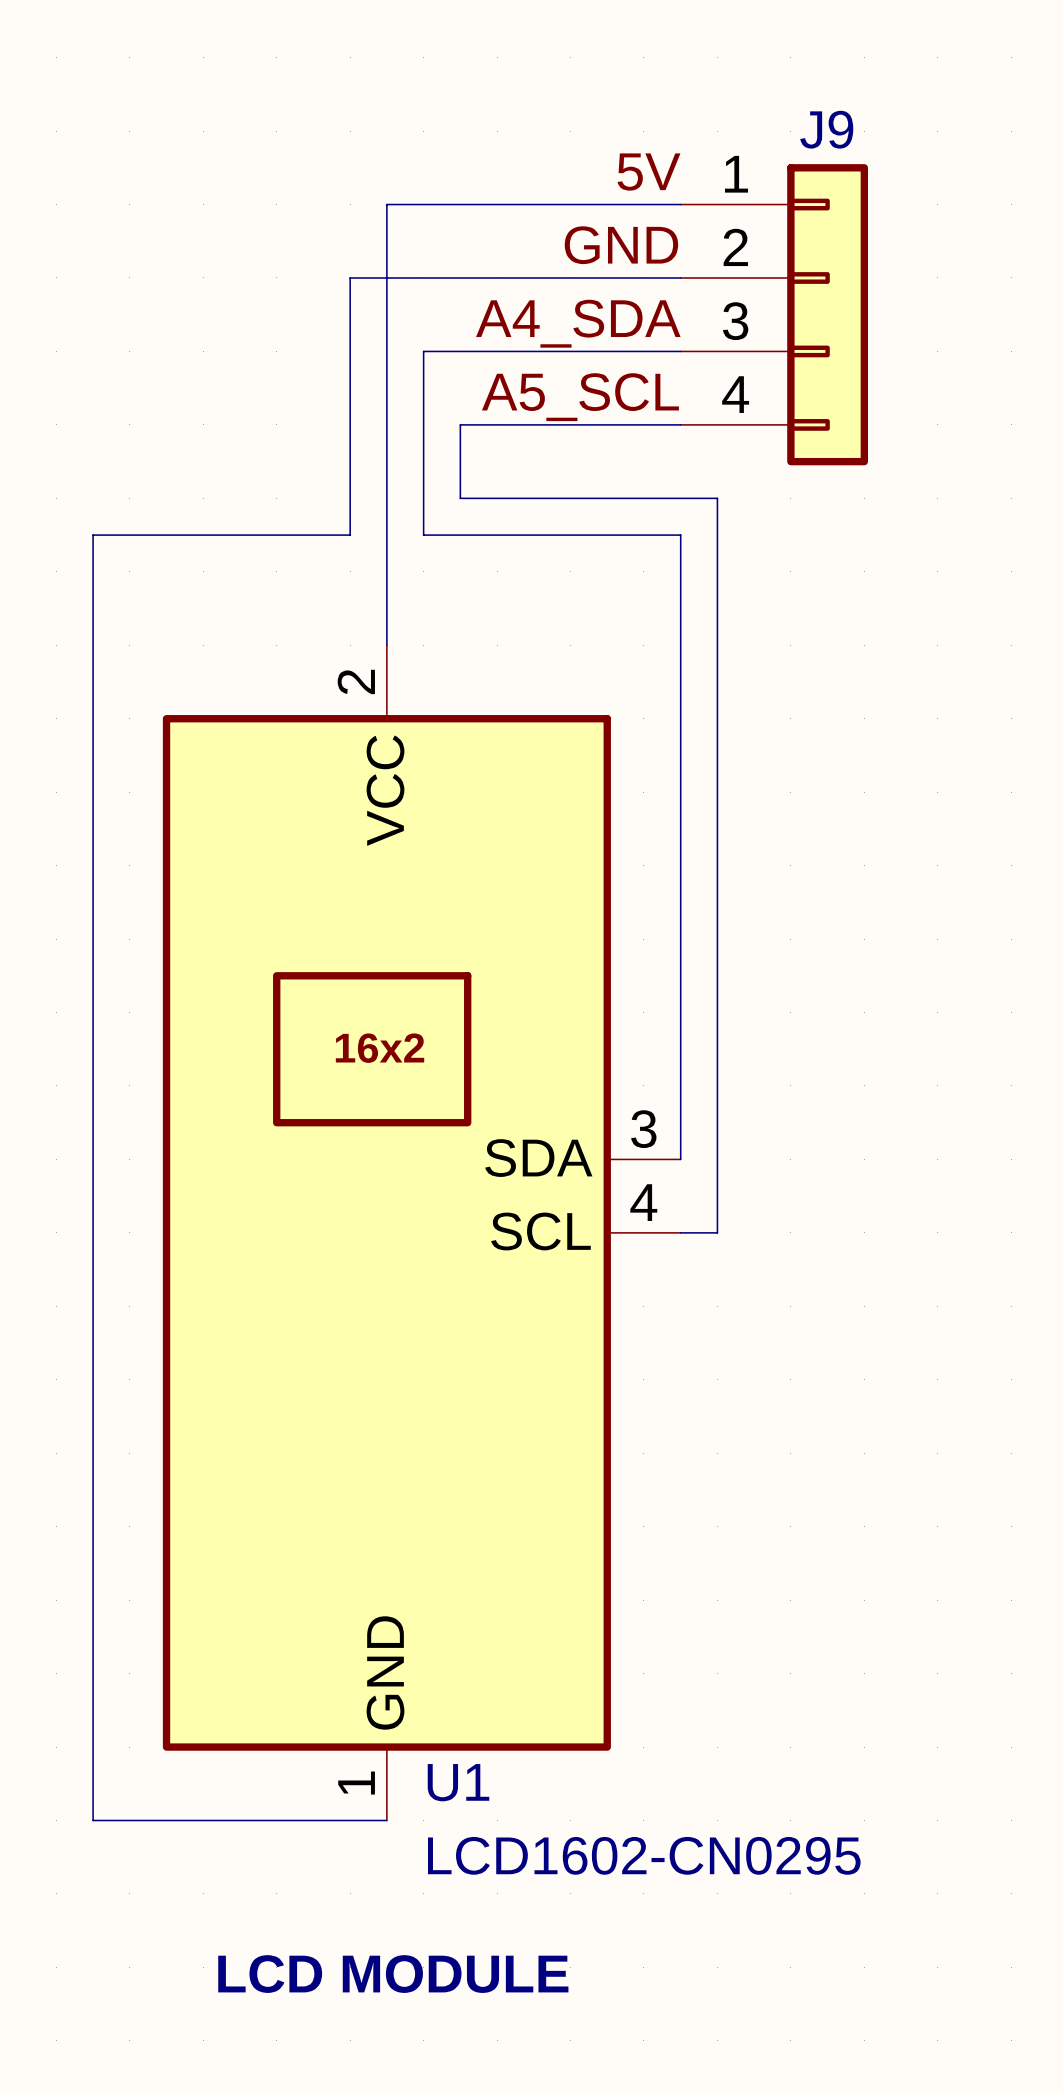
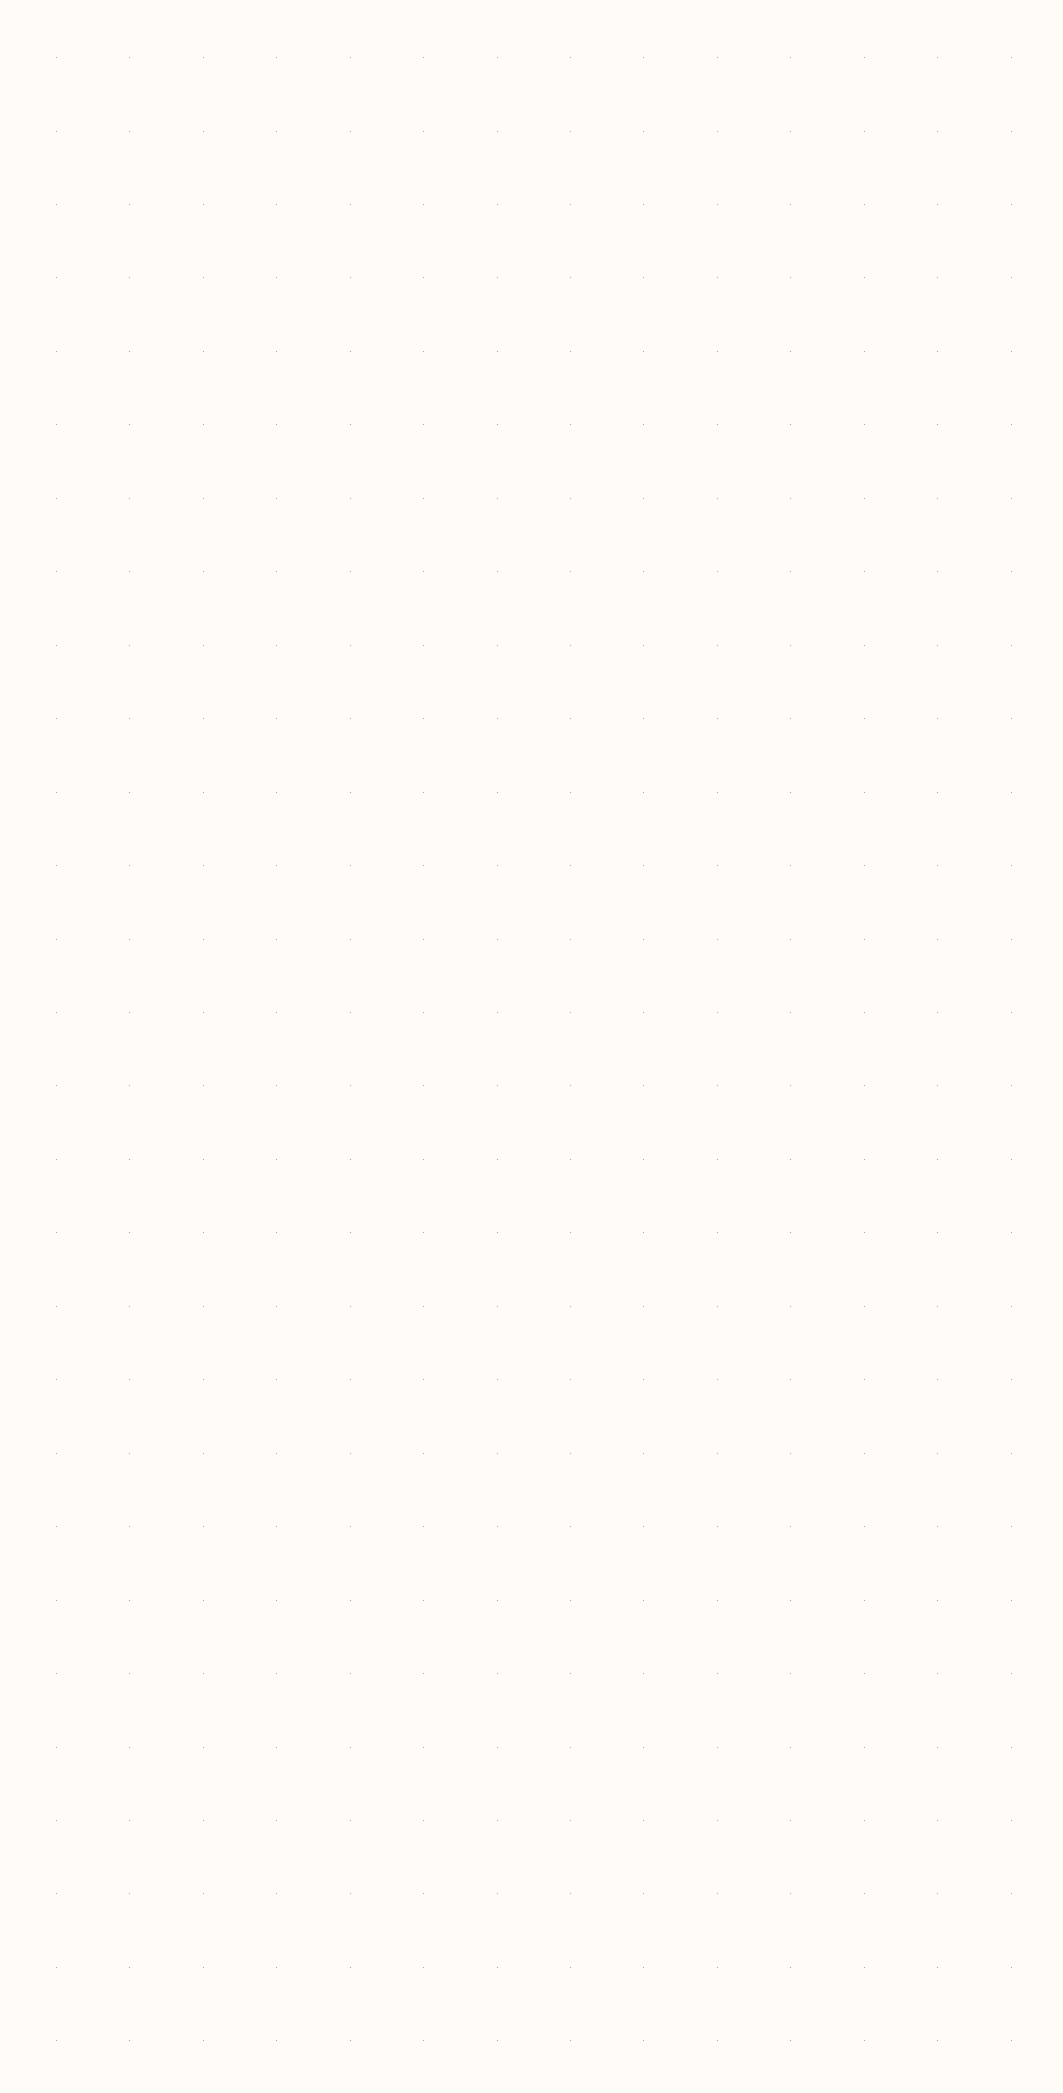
label: 5V (649, 172) -> none
wire: (680, 204) (386, 204) (386, 645) -> none
label: GND (621, 245) -> none
wire: (680, 277) (350, 277) (350, 535) (93, 535) (93, 1820) (386, 1820) -> none
J9: (774, 314) -> none
label: A4_SDA (578, 323) -> none
wire: (680, 351) (423, 351) (423, 535) (680, 535) (680, 1159) -> none
label: A5_SCL (580, 397) -> none
wire: (680, 424) (460, 424) (460, 498) (717, 498) (717, 1232) (680, 1232) -> none
U1: LCD1602-CN0295 (421, 1232) -> none
text: LCD MODULE (393, 1974) -> none

